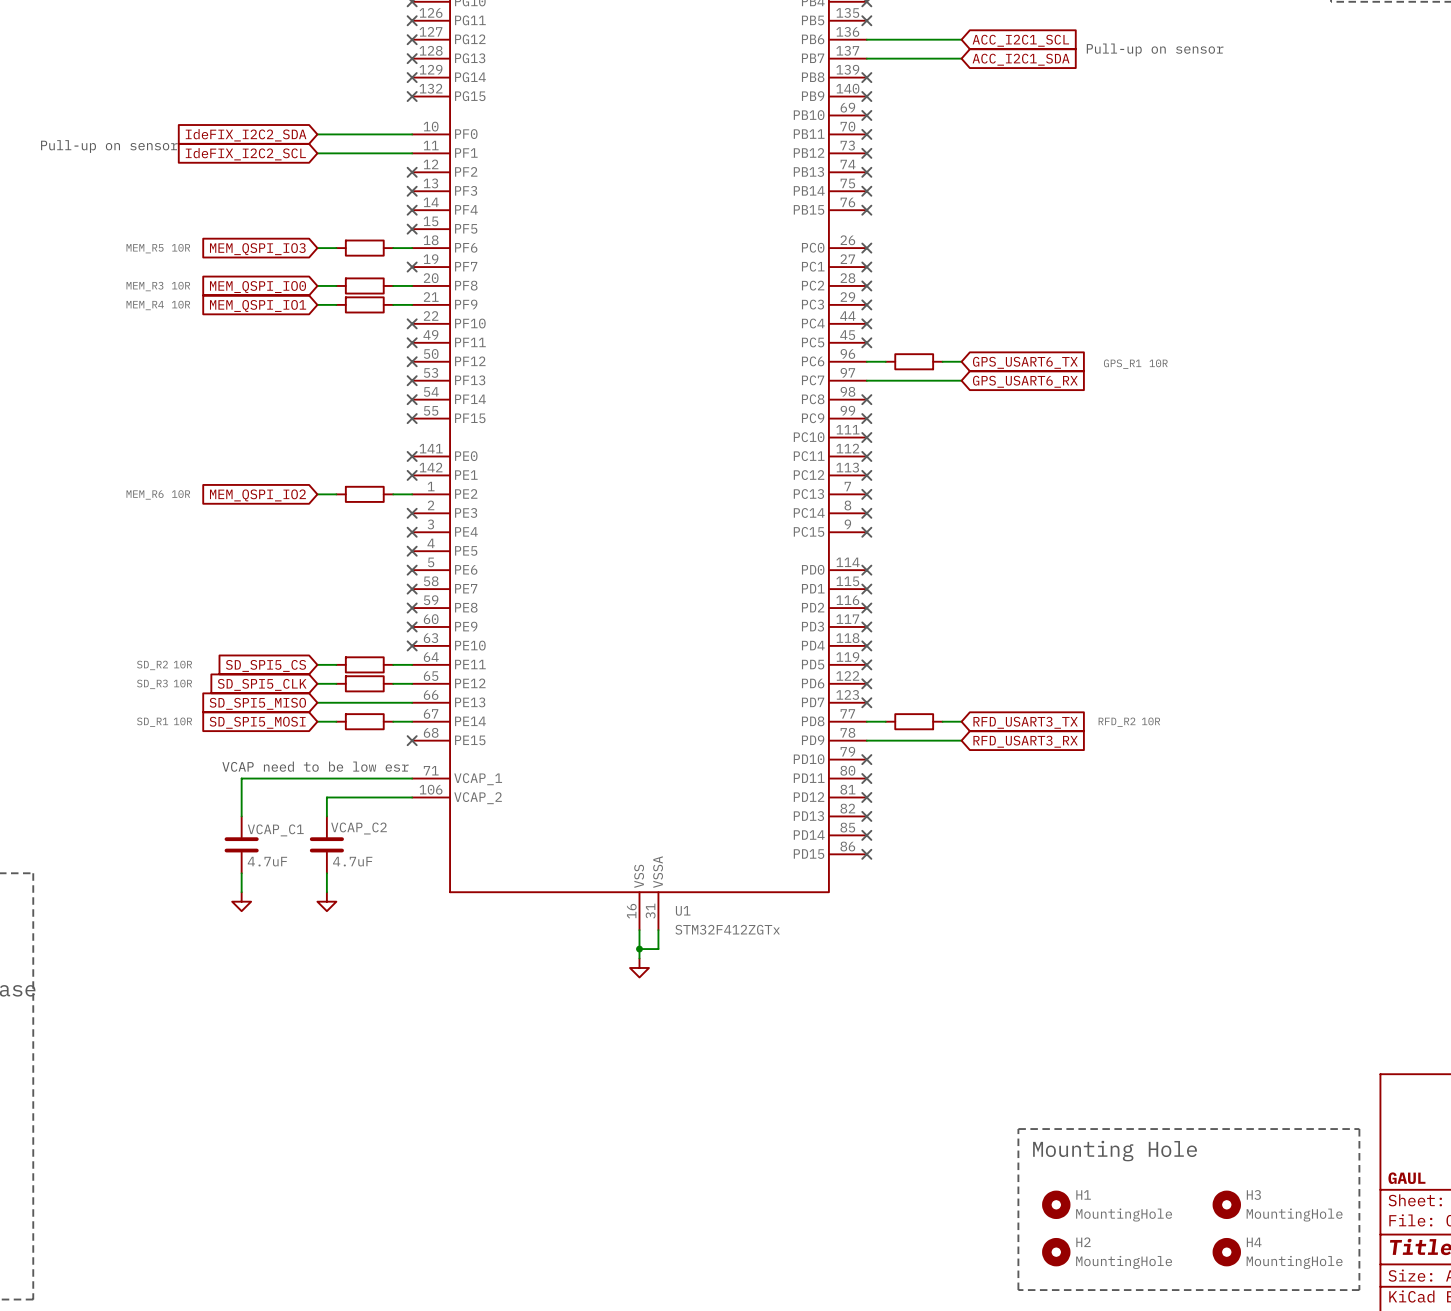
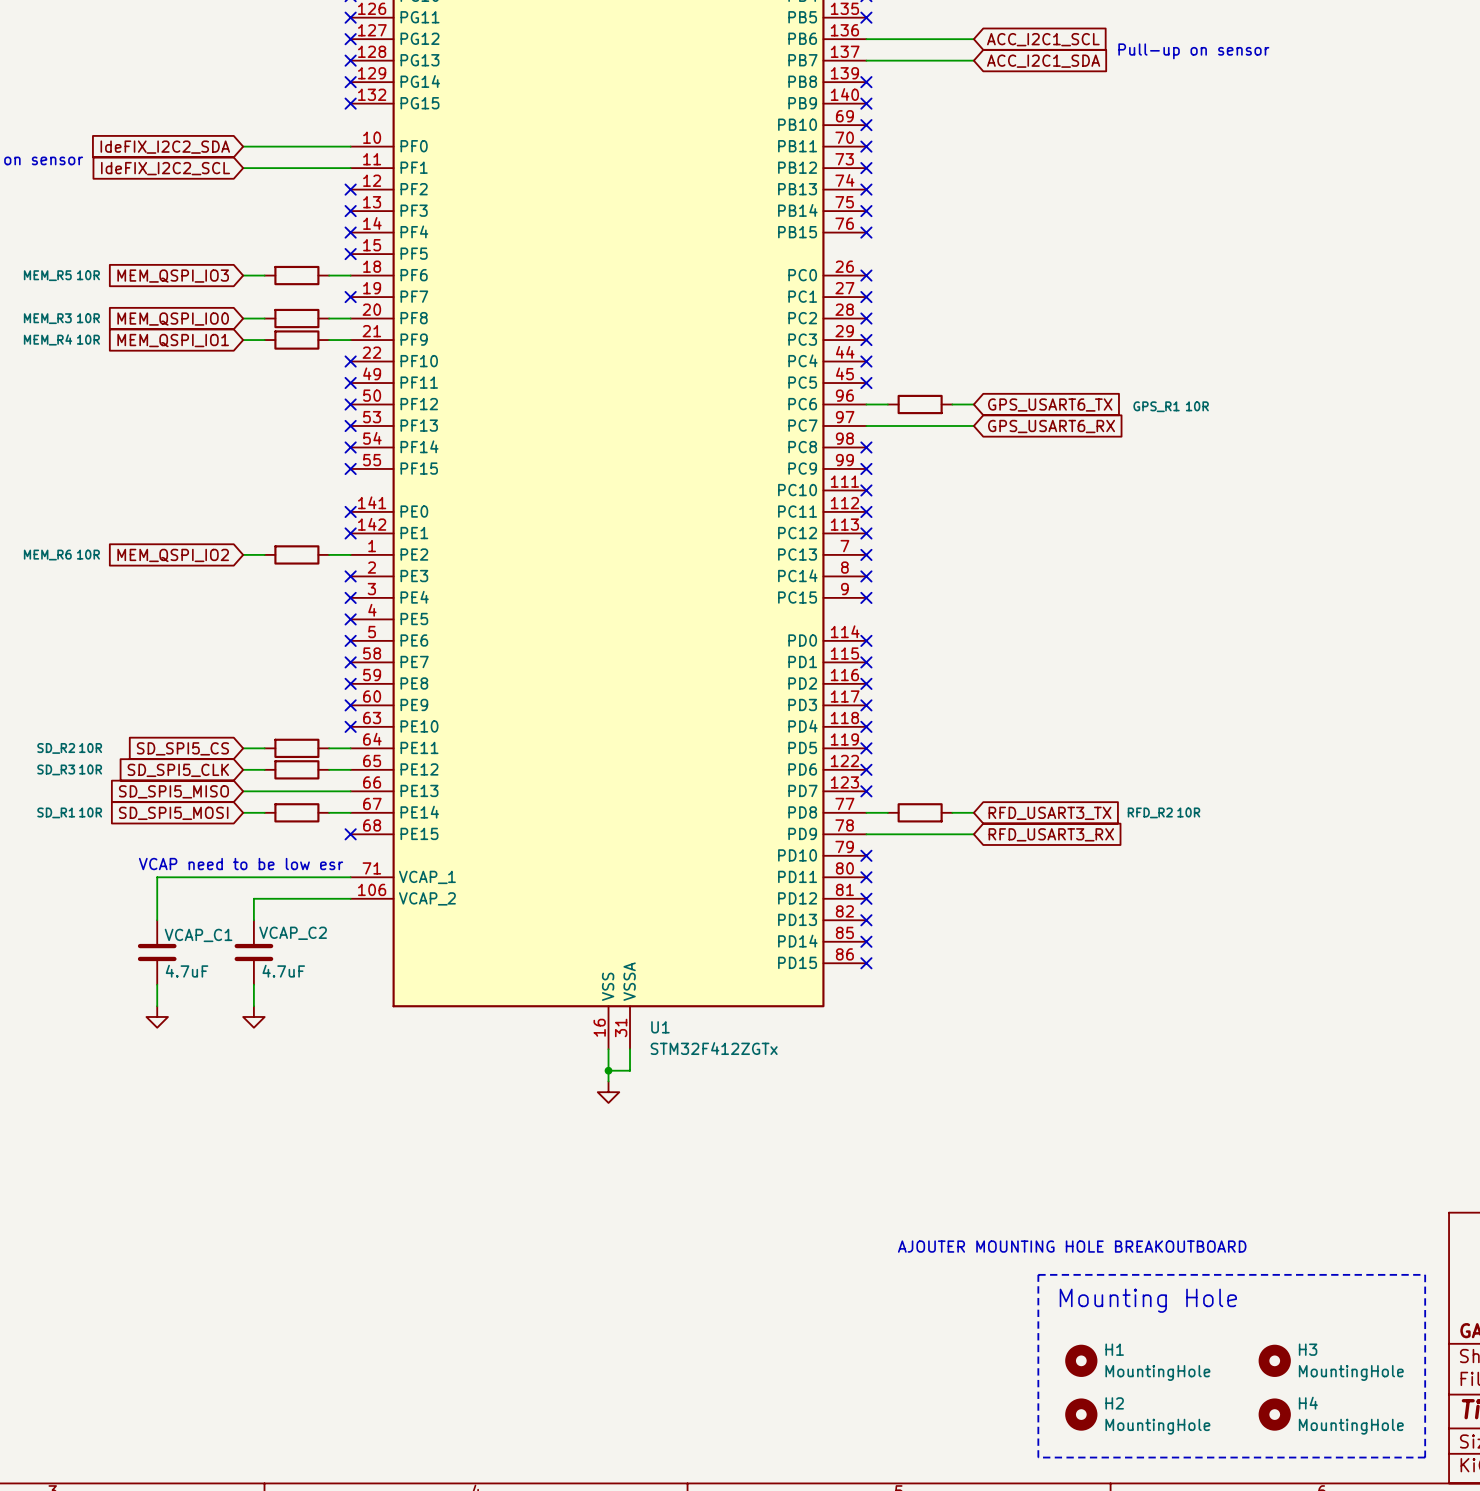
text: none -> AJOUTER MOUNTING HOLE BREAKOUTBOARD (1072, 1246)

